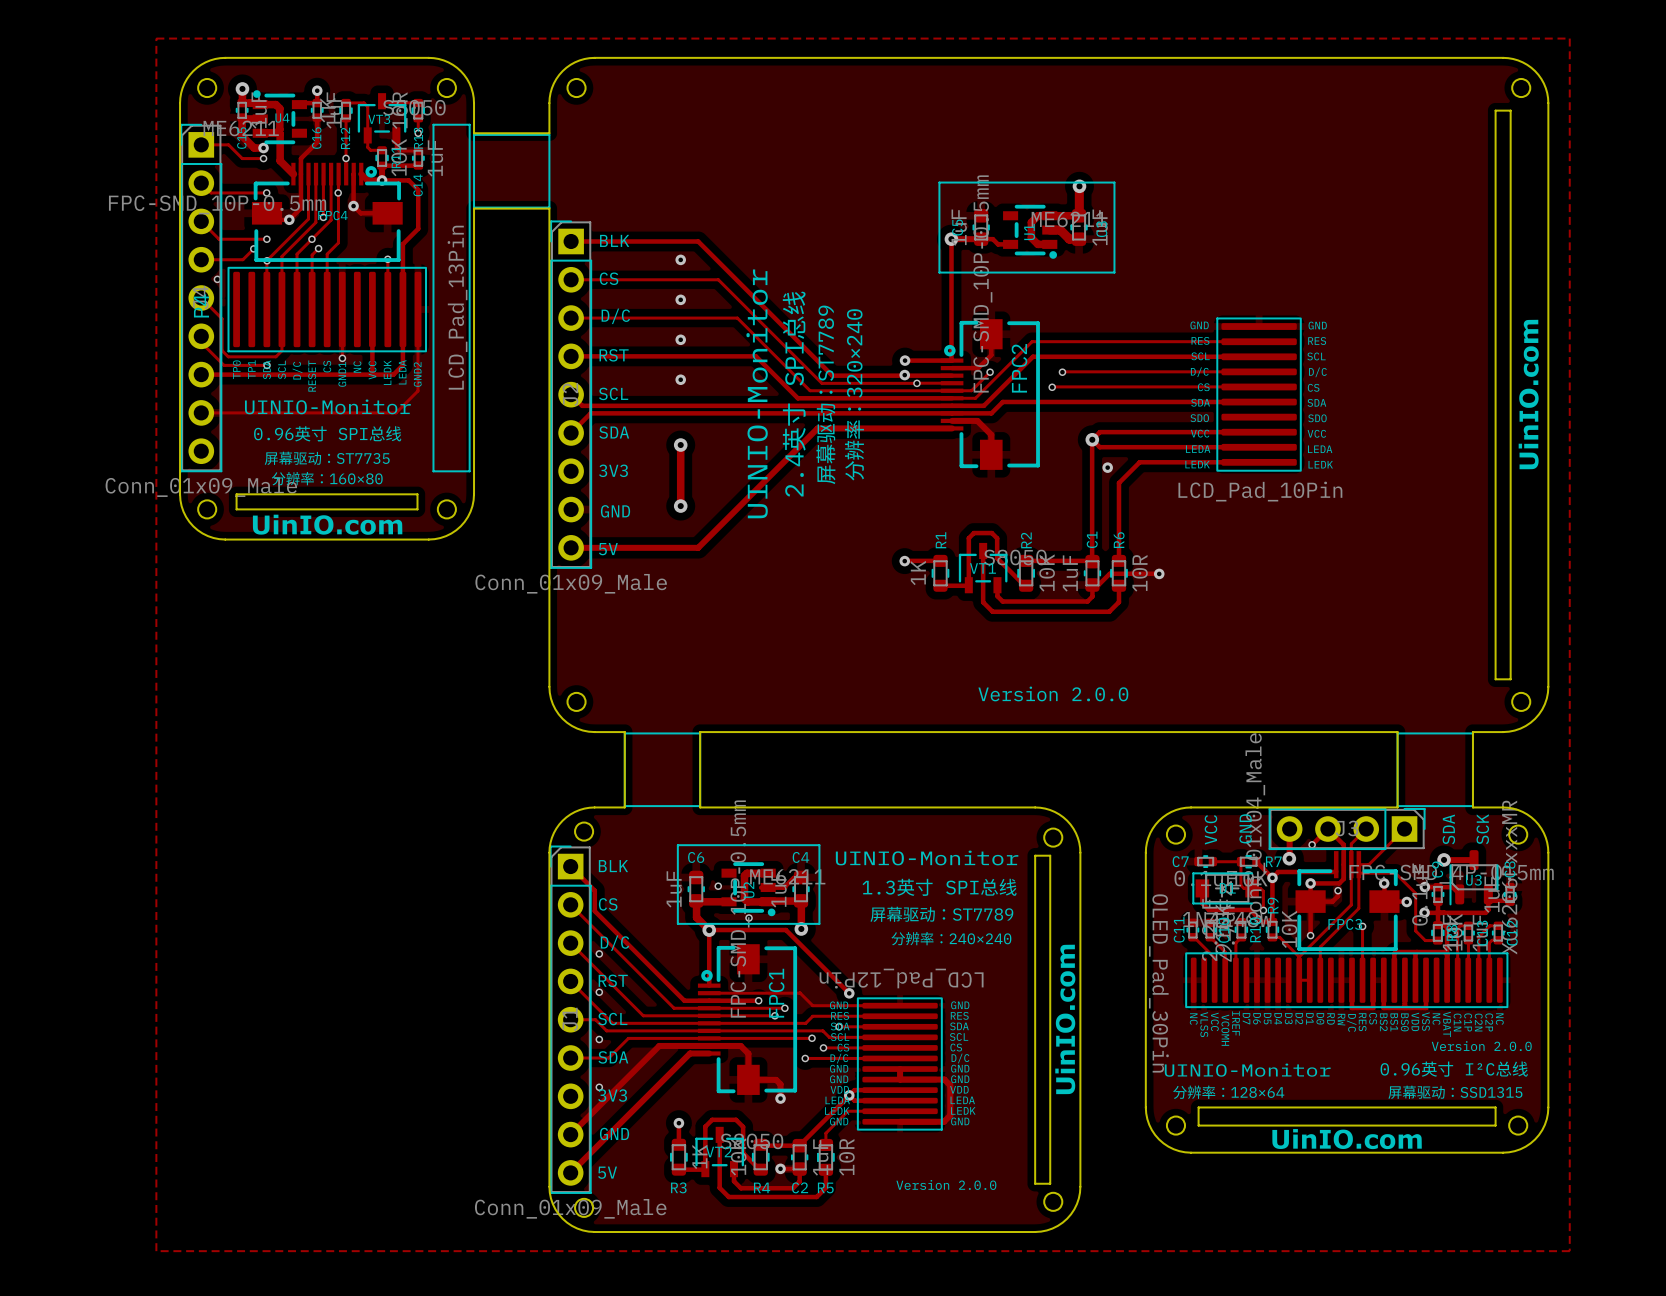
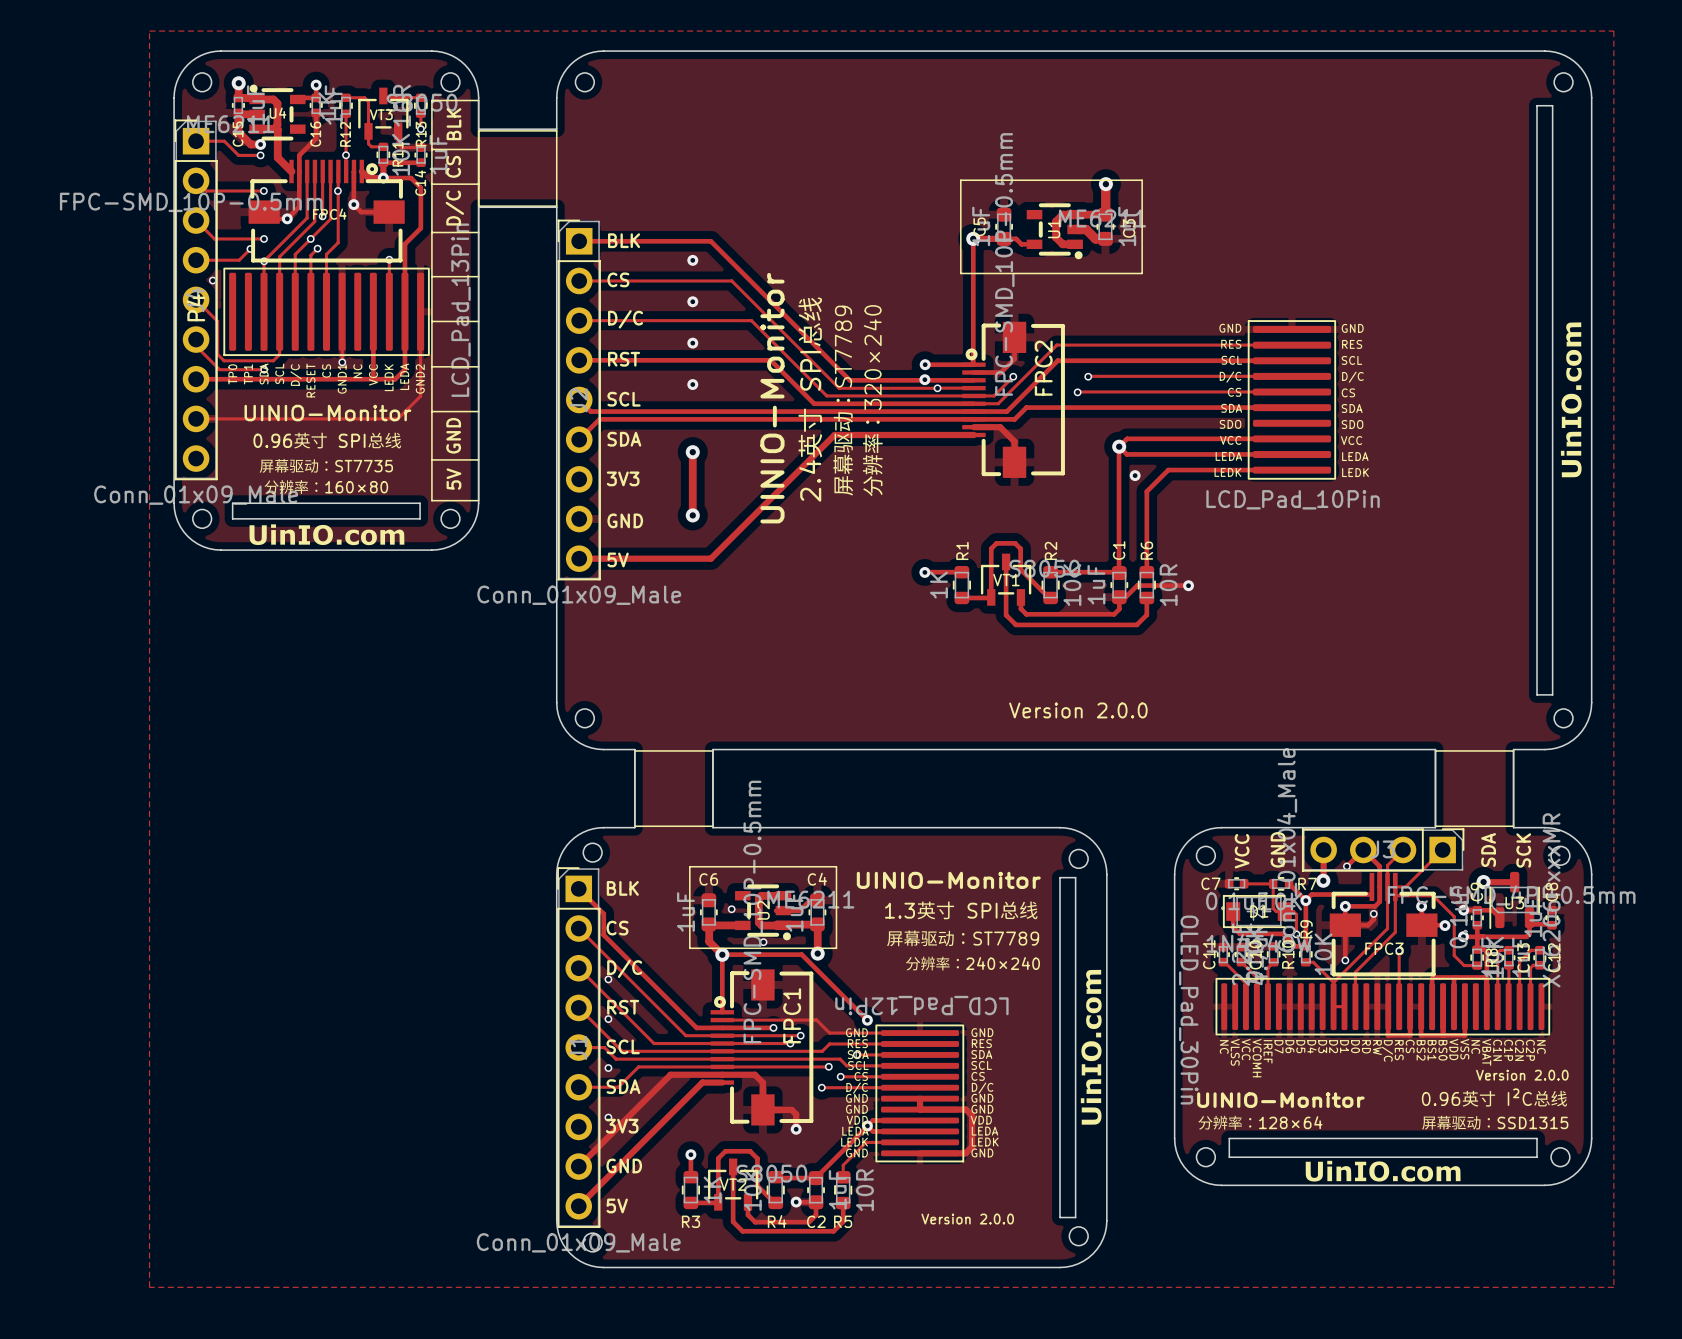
line: (433, 124) (469, 124) (469, 471) (433, 471) (433, 124) -> none
text: none -> BLK (453, 124)
line: none -> (478, 130) (478, 100) (431, 100) (431, 500) (478, 500) (478, 206)
line: none -> (431, 149) (478, 149)
text: none -> CS (453, 166)
line: none -> (431, 184) (478, 184)
text: none -> D/C (454, 208)
line: none -> (431, 232) (478, 232)
line: none -> (431, 276) (478, 276)
line: none -> (431, 321) (478, 321)
line: none -> (431, 366) (478, 366)
line: none -> (431, 411) (478, 411)
text: none -> GND (453, 435)
line: none -> (431, 459) (478, 459)
text: none -> 5V (453, 479)

